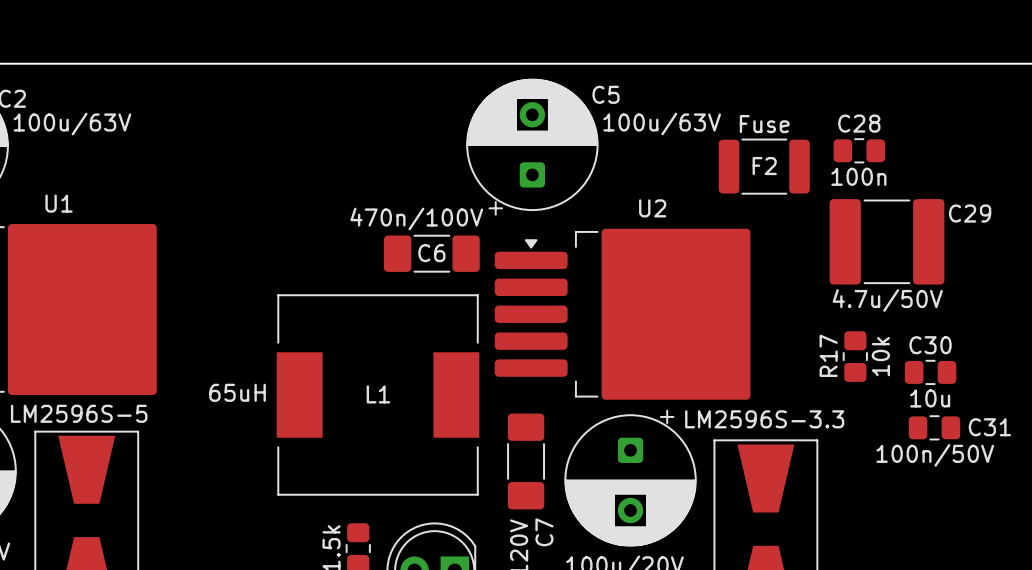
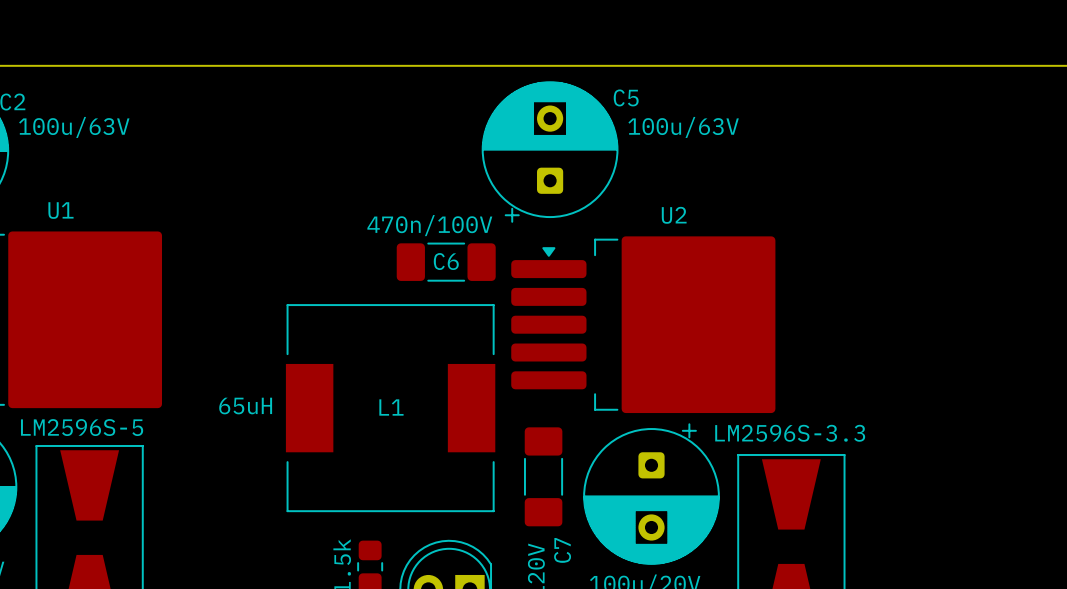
C28: 100n (859, 150) -> none
F2: Fuse (764, 166) -> none
C29: 4.7u/50V (887, 241) -> none
R17: 10k (855, 356) -> none
C30: 10u (930, 372) -> none
C31: 100n/50V (934, 427) -> none

